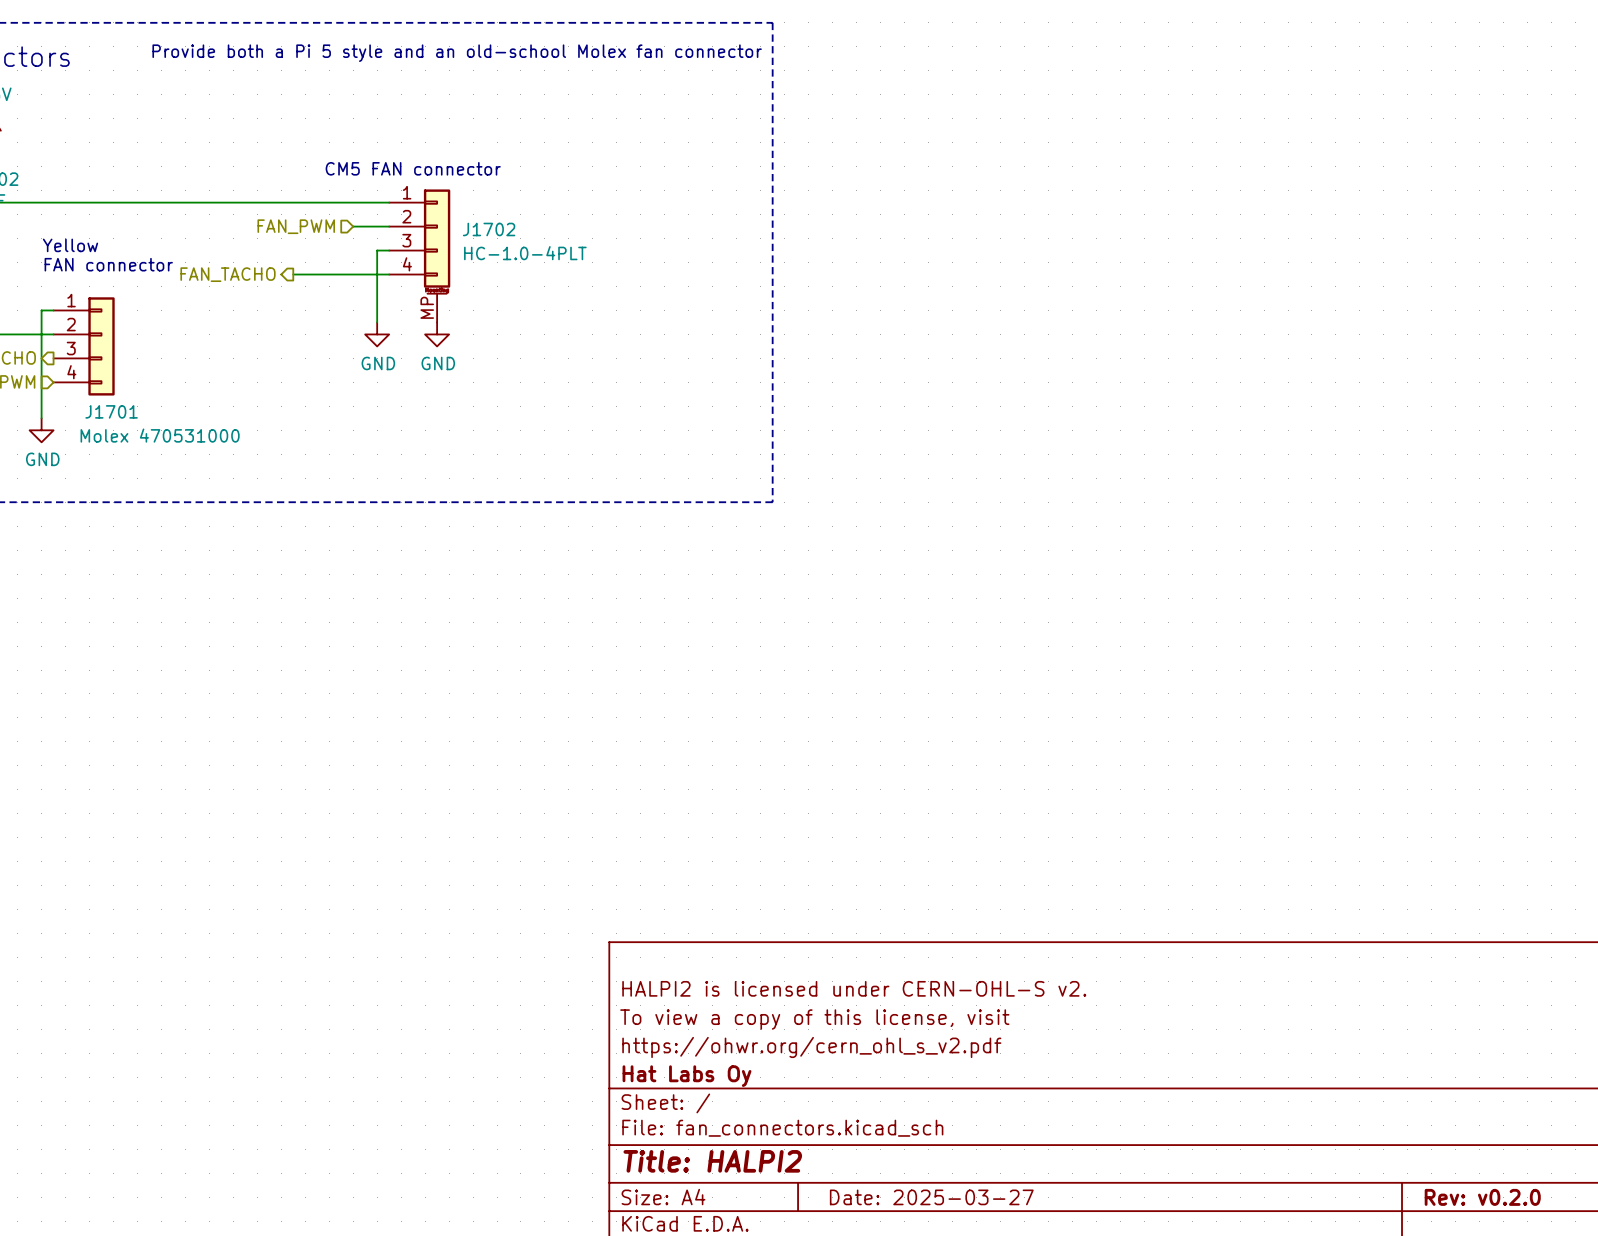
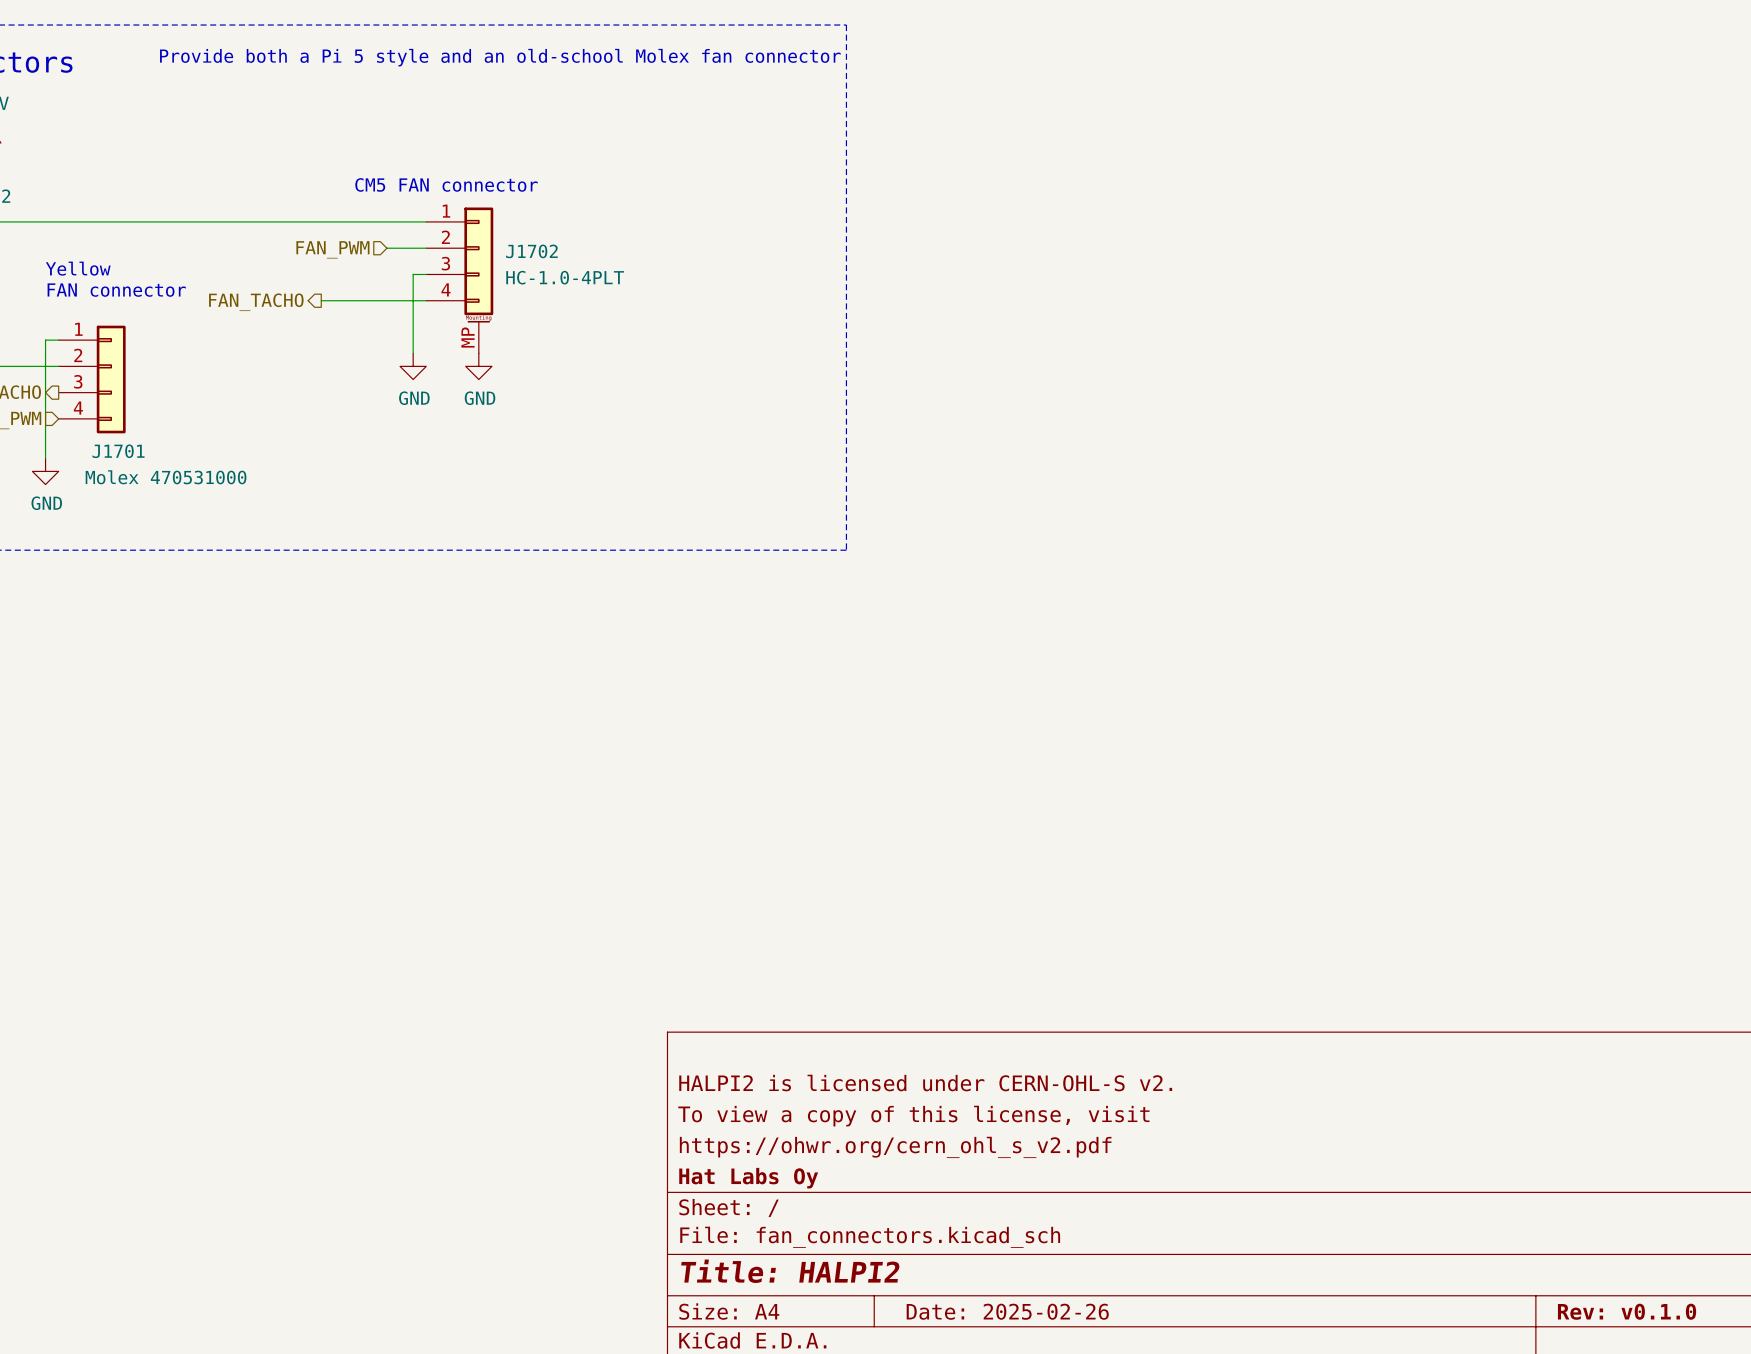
title block: Date: 2025-03-27 (931, 1197) -> Date: 2025-02-26 (1007, 1311)
title block: Rev: v0.2.0 (1482, 1197) -> Rev: v0.1.0 (1627, 1311)

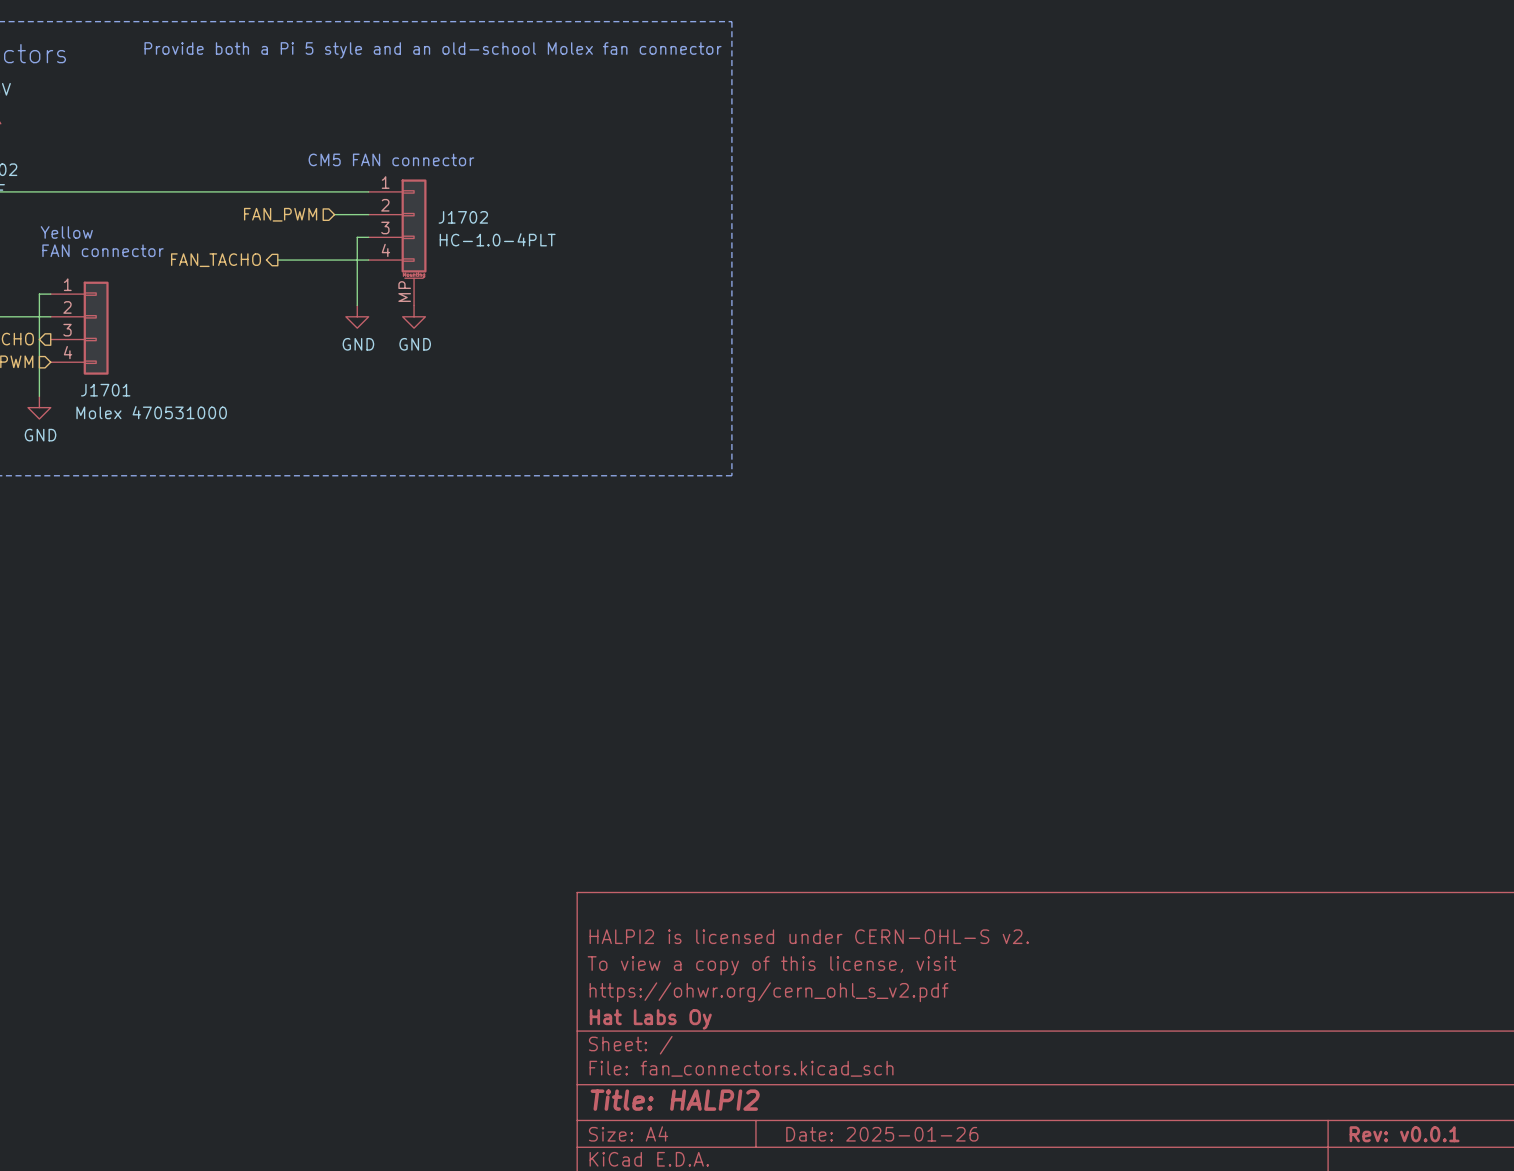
title block: Date: 2025-02-26 (1007, 1311) -> Date: 2025-01-26 (882, 1134)
title block: Rev: v0.1.0 (1627, 1311) -> Rev: v0.0.1 (1404, 1134)

